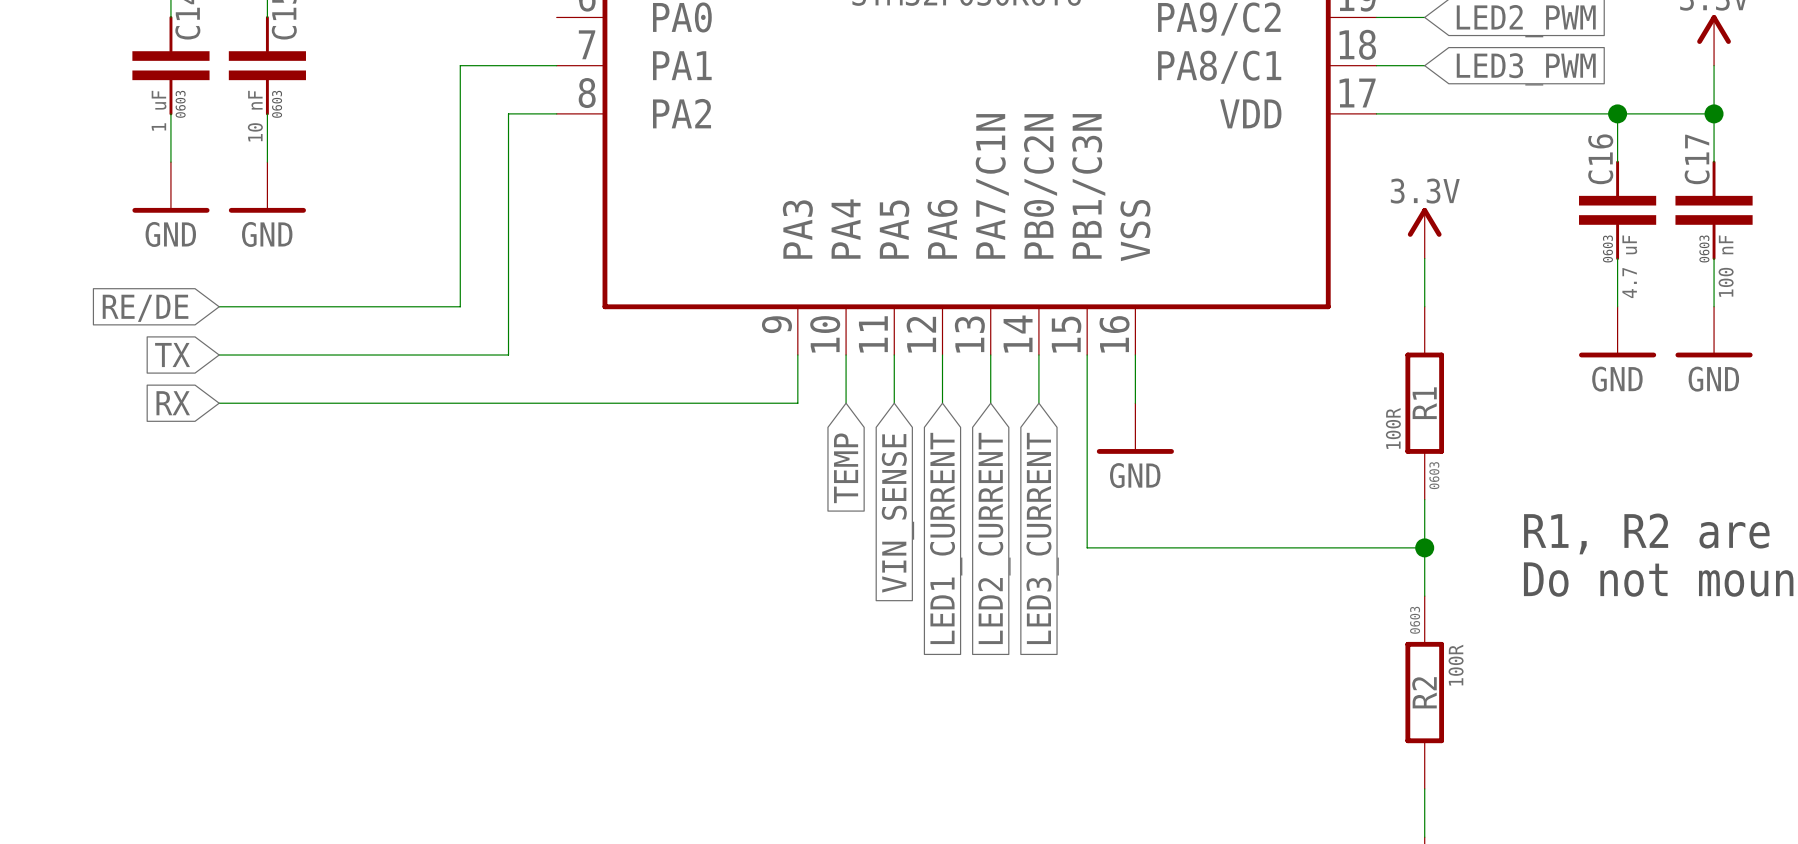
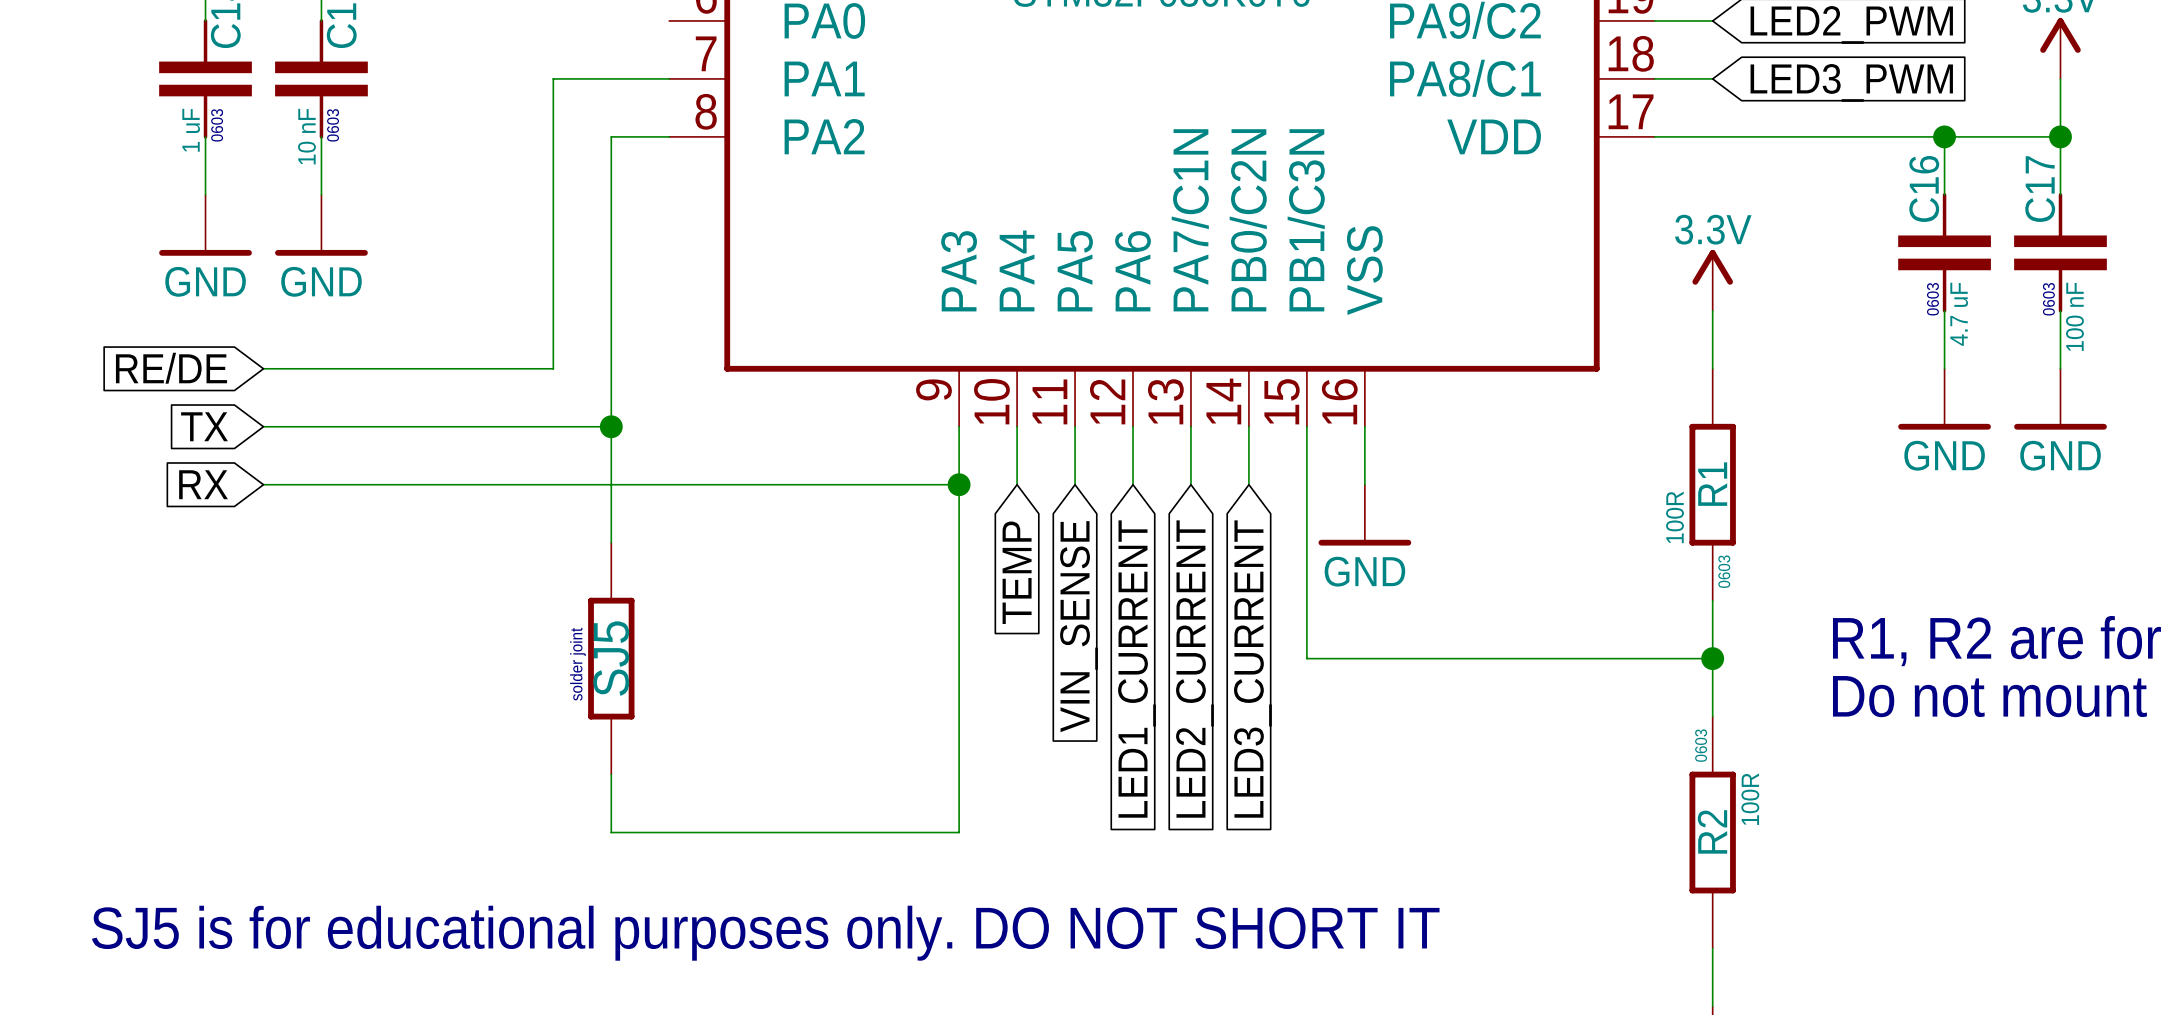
wire: none -> (611, 426) (611, 542)
junction: none -> (611, 426)
wire: none -> (959, 484) (959, 832) (611, 832) (611, 774)
junction: none -> (959, 484)
SJ5: none -> (611, 658)
text: none -> SJ5 is for educational purposes only. DO NOT SHORT IT (765, 933)

